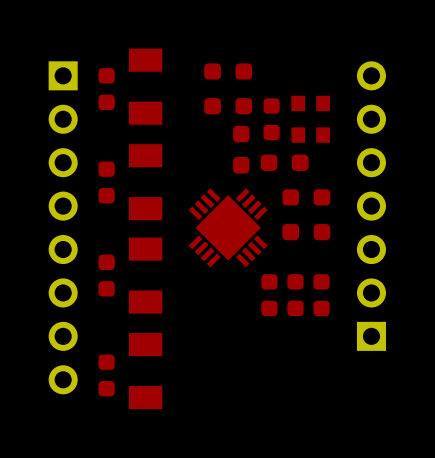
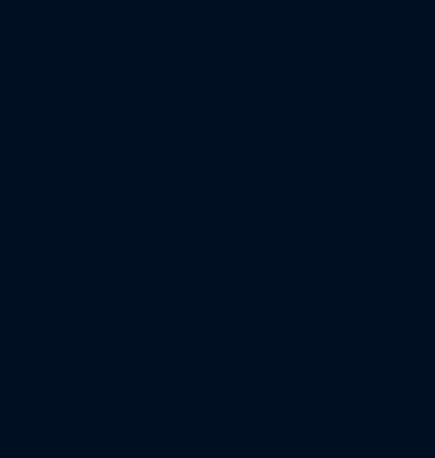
part: (228, 71) -> none
part: (145, 86) -> none
part: (106, 89) -> none
part: (228, 106) -> none
part: (271, 119) -> none
part: (310, 119) -> none
part: (241, 149) -> none
part: (284, 162) -> none
part: (106, 182) -> none
part: (145, 182) -> none
part: (306, 197) -> none
part: (371, 206) -> none
part: (63, 227) -> none
part: (228, 227) -> none
part: (306, 232) -> none
part: (106, 275) -> none
part: (145, 275) -> none
part: (269, 295) -> none
part: (295, 295) -> none
part: (321, 295) -> none
part: (145, 371) -> none
part: (106, 375) -> none

